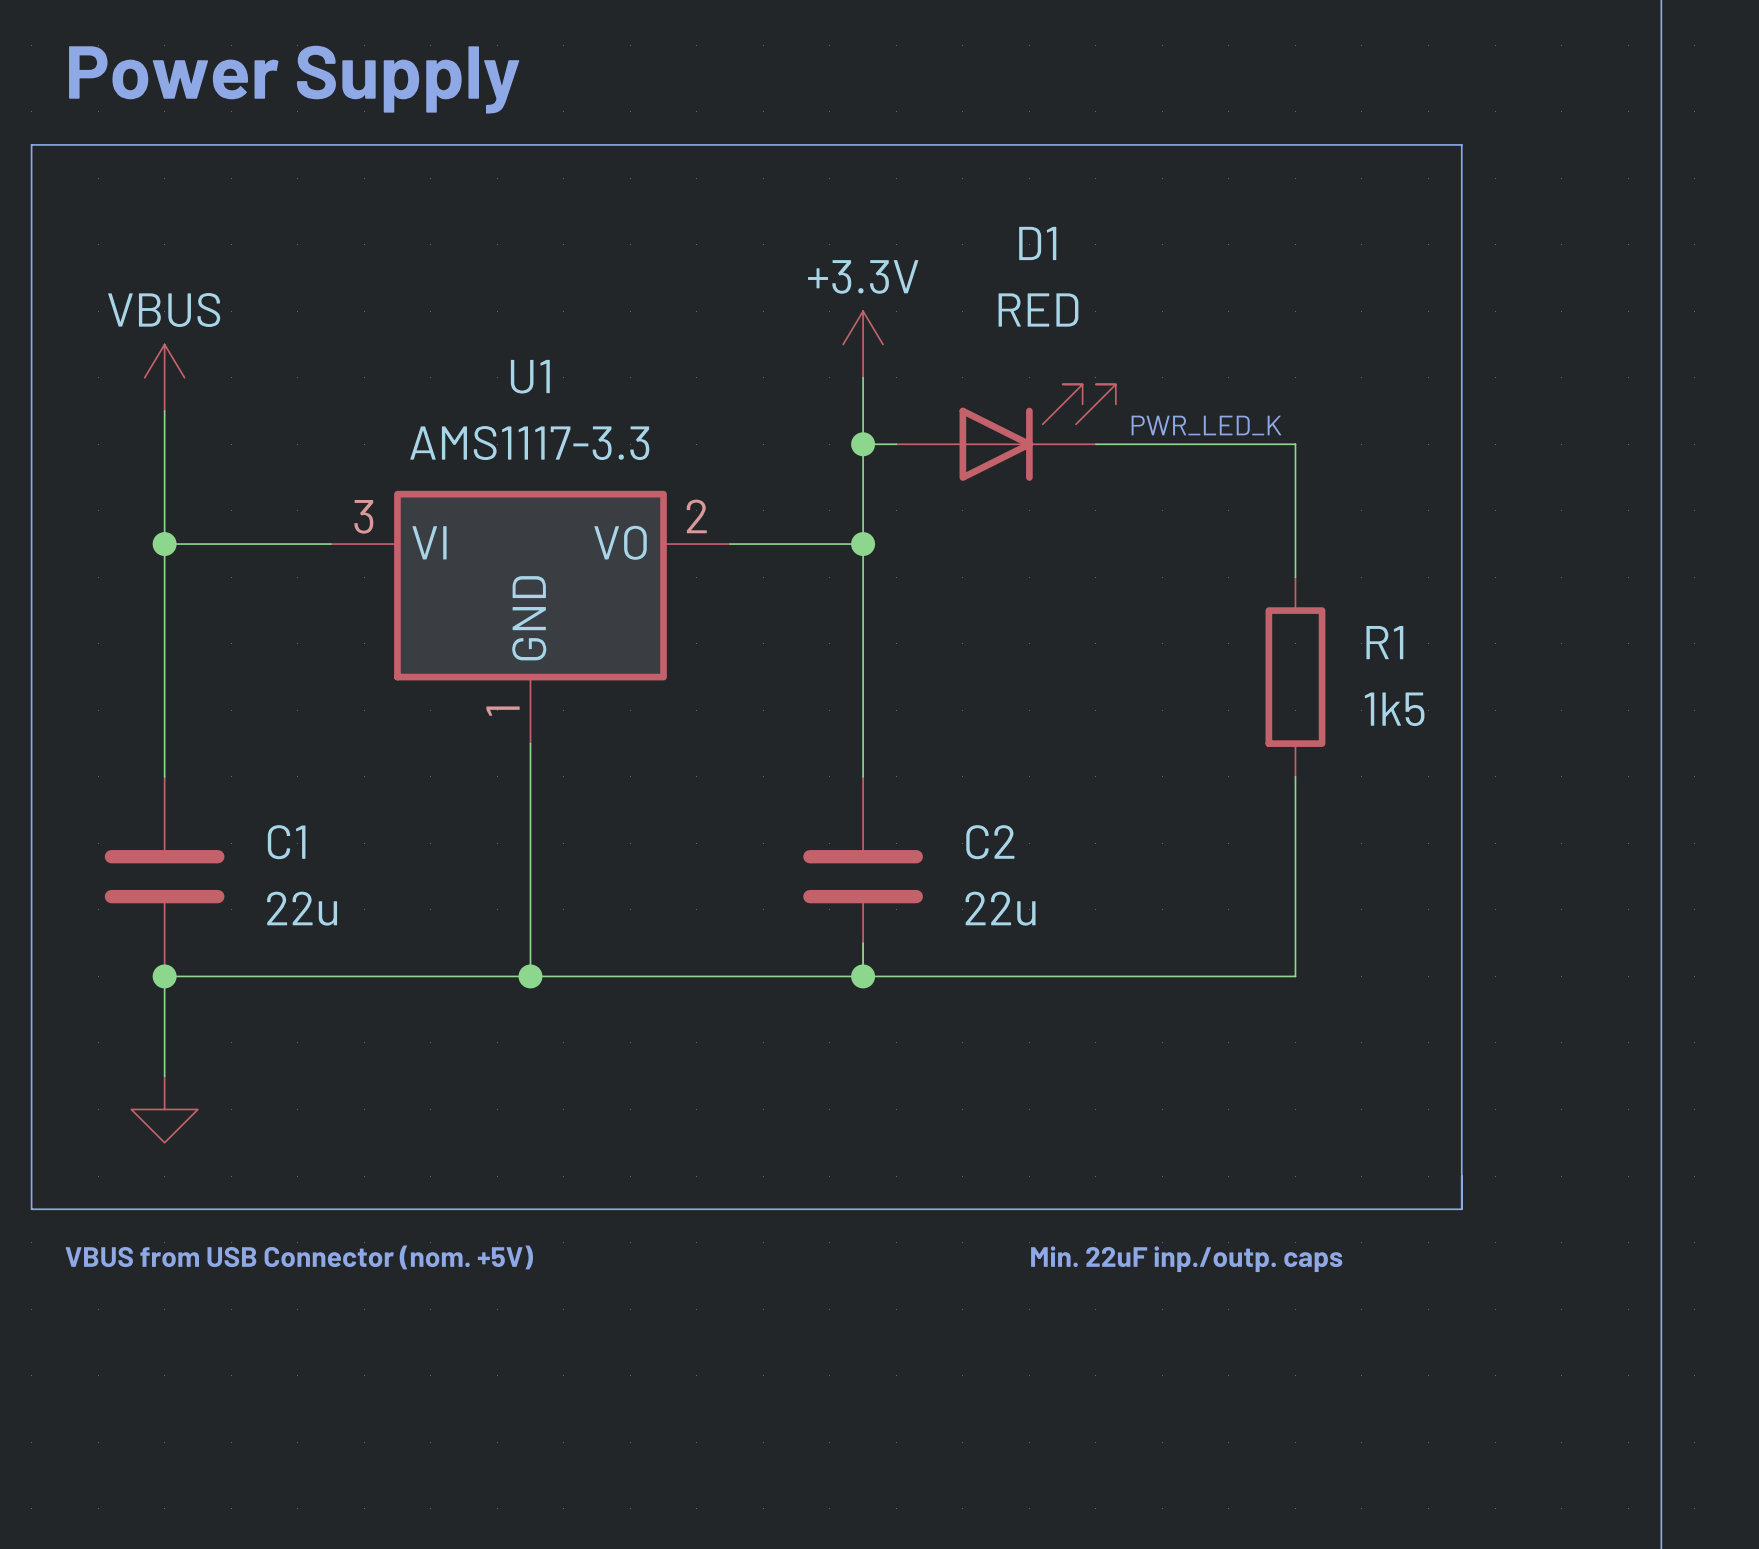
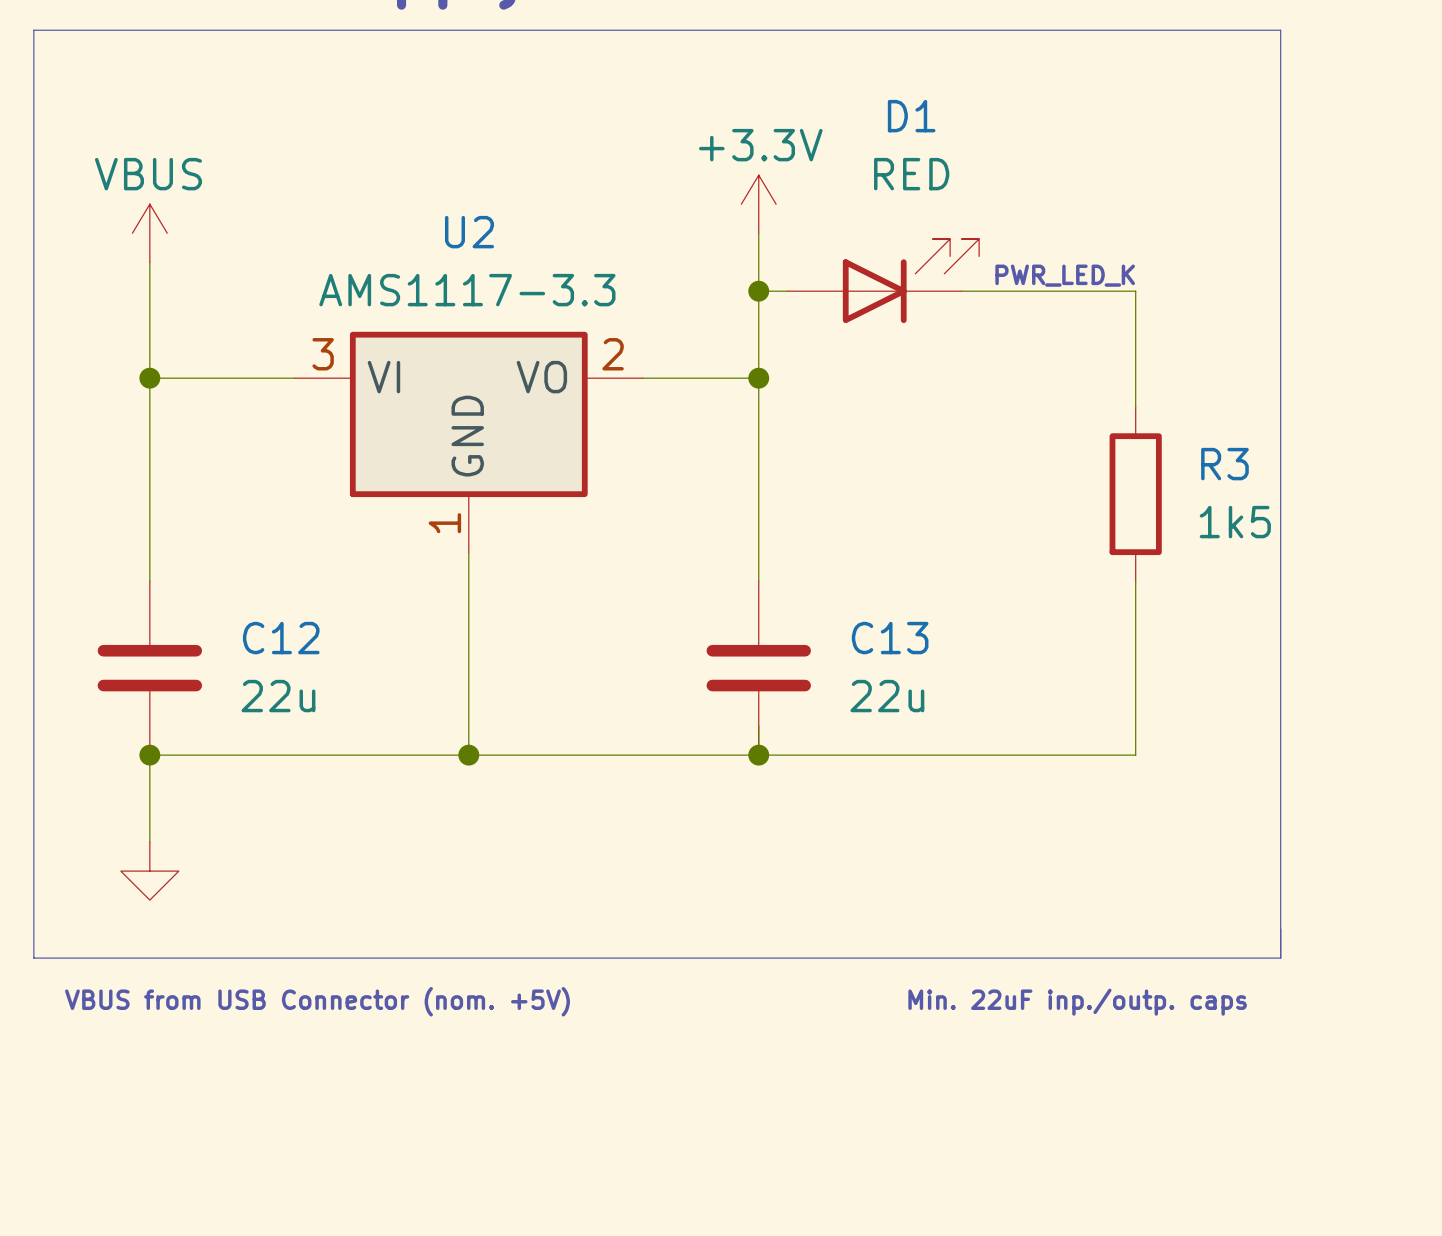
U1 name: U1 (530, 376) -> U2 (469, 232)
R1 name: R1 (1384, 642) -> R3 (1224, 464)
C1 name: C1 (286, 842) -> C12 (281, 638)
C2 name: C2 (990, 842) -> C13 (890, 638)

